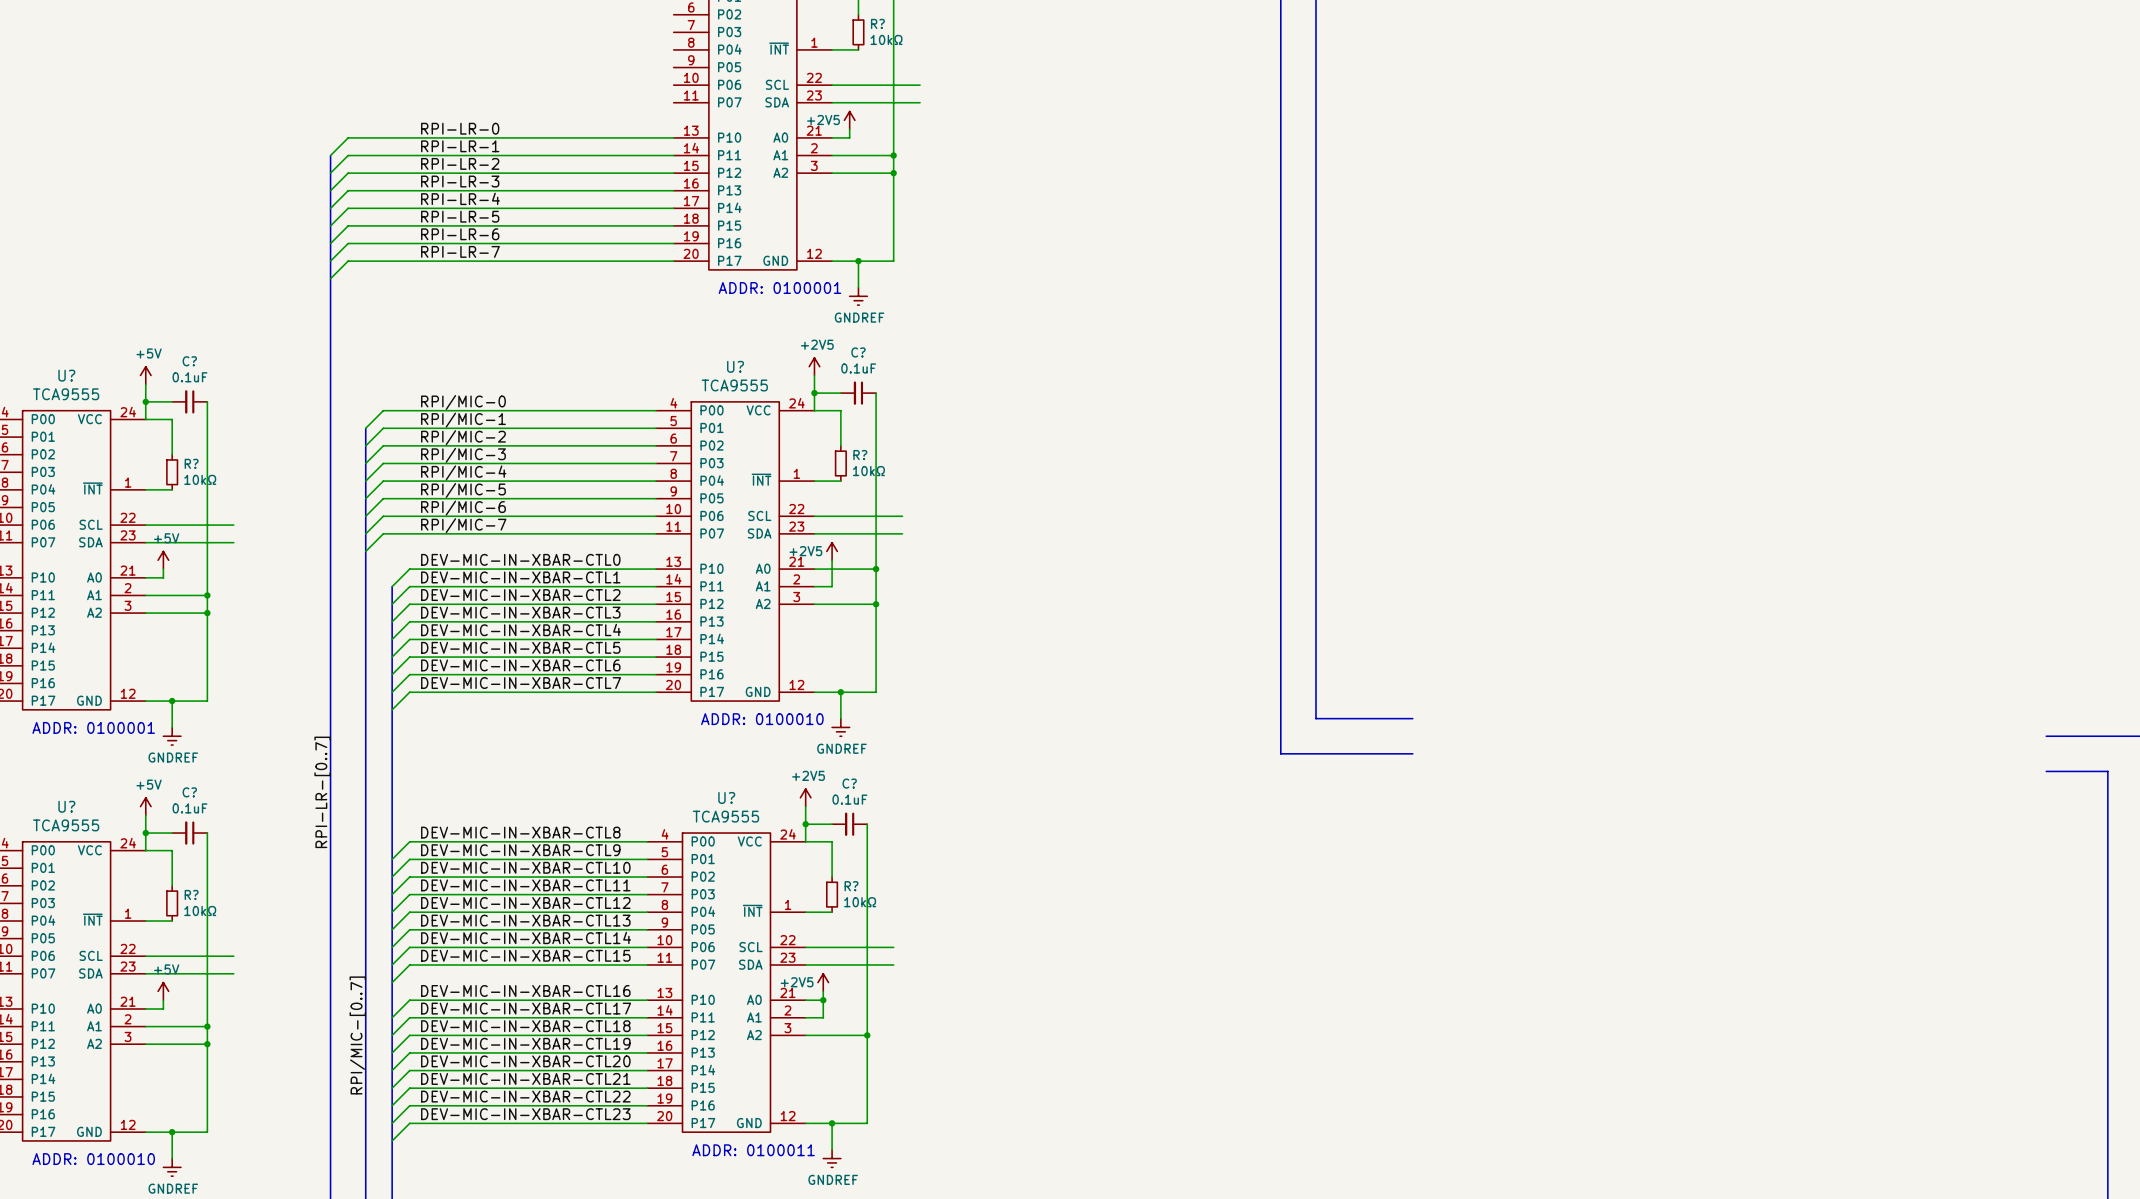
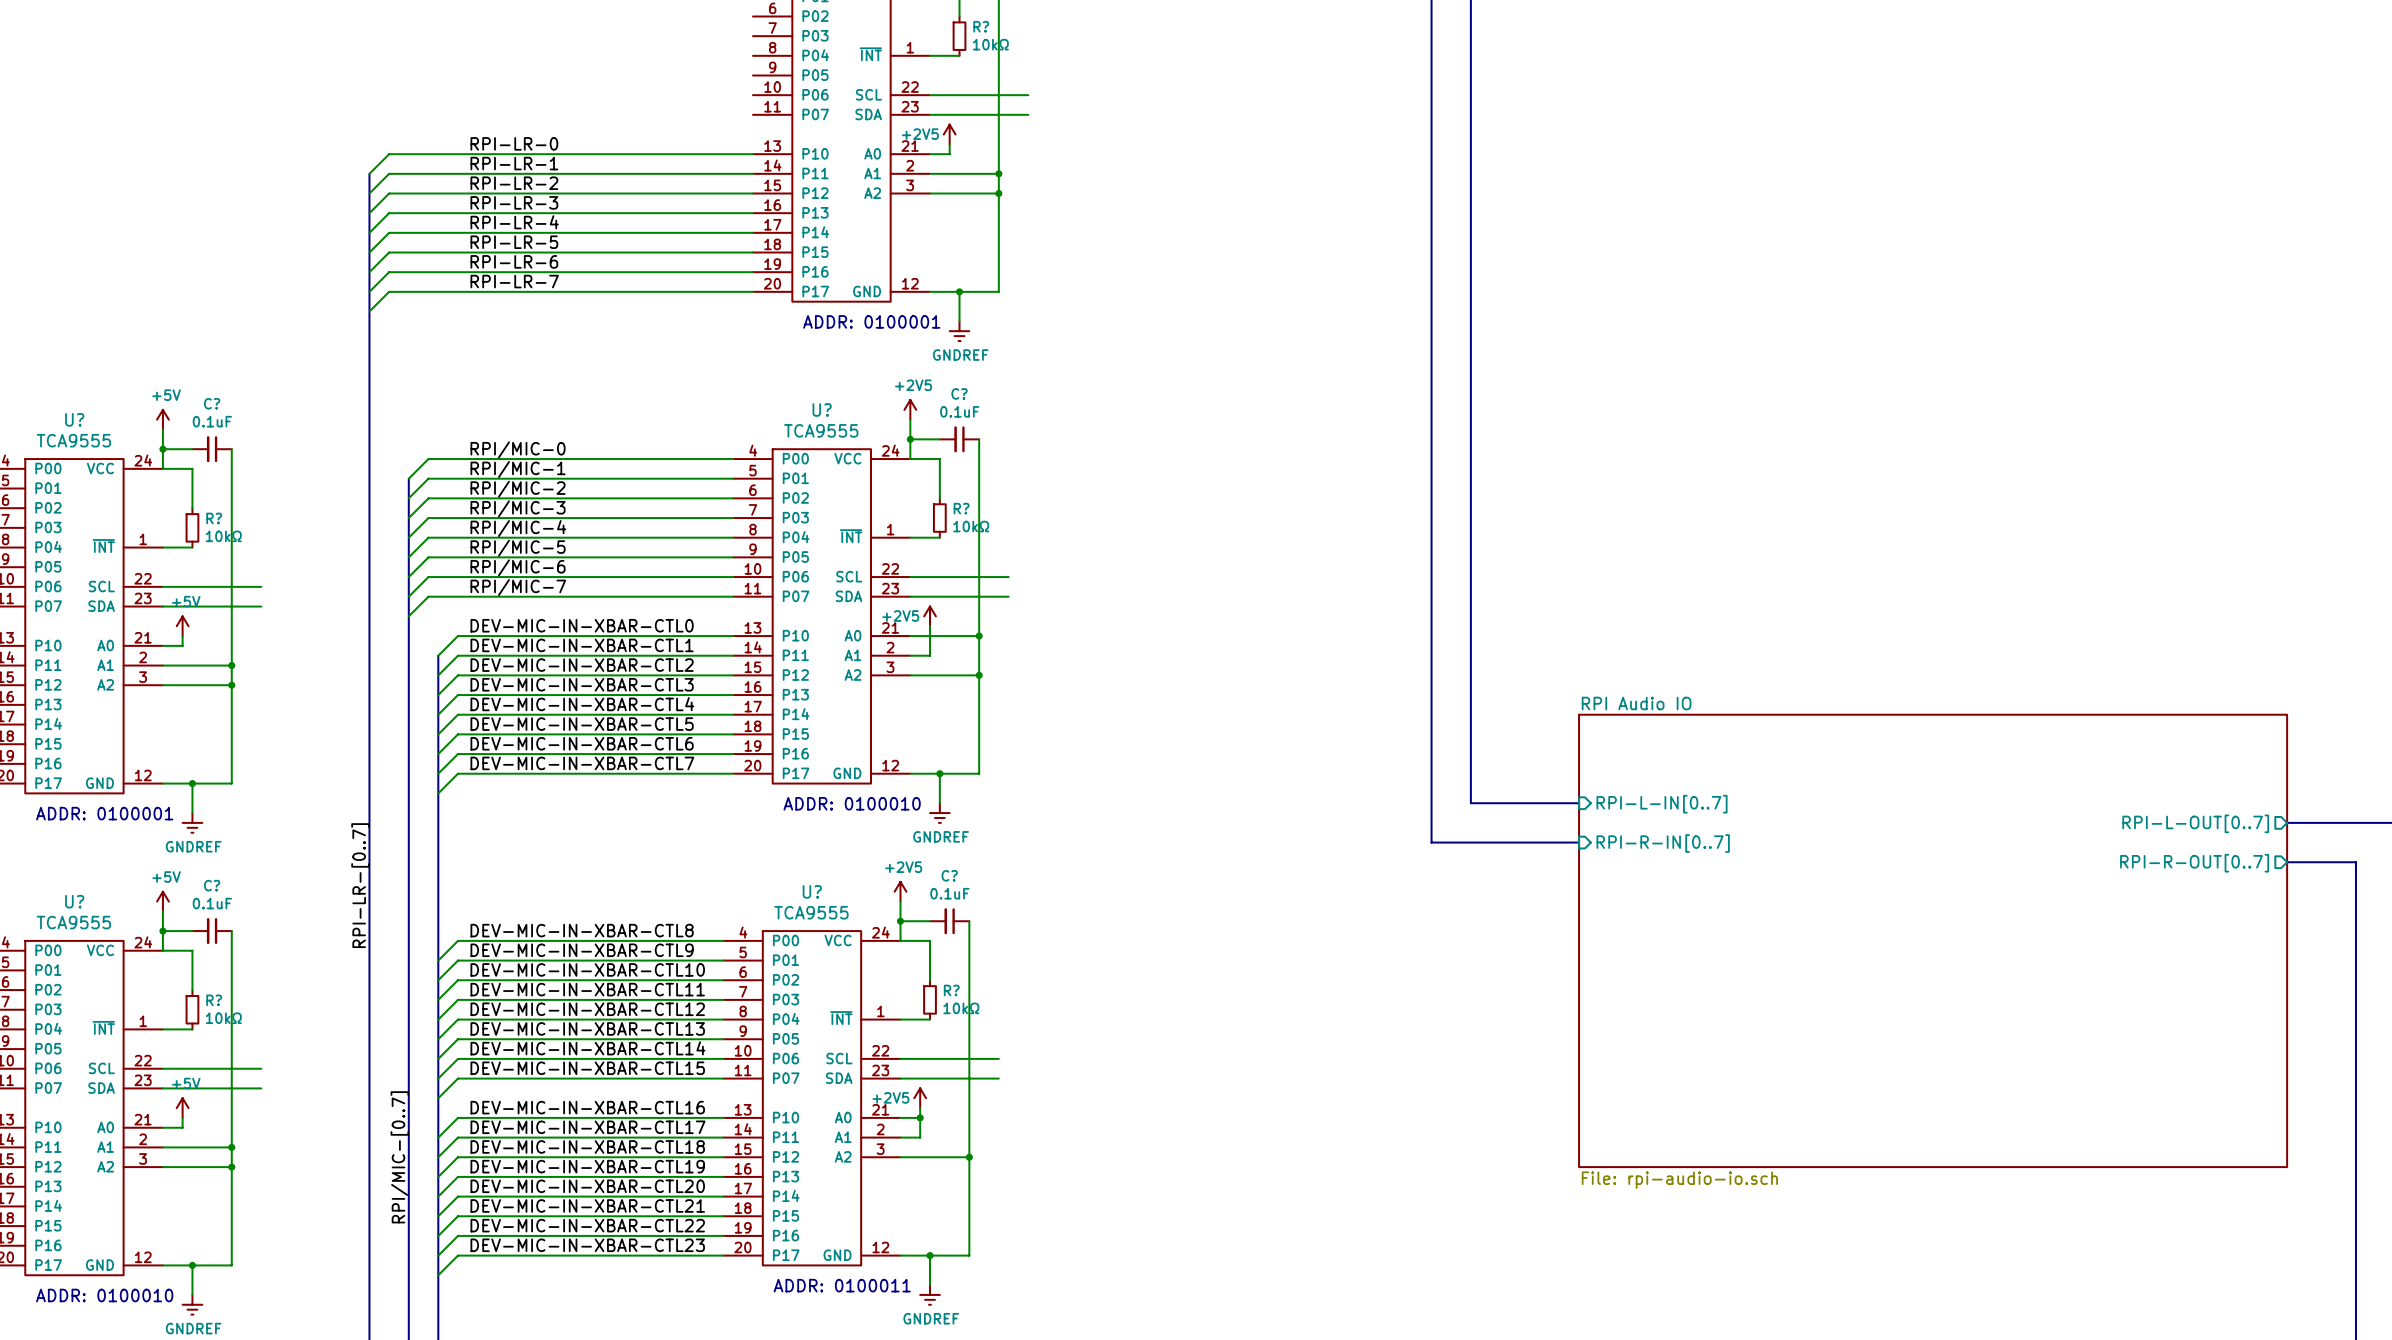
sheet pin: none -> RPI-L-IN[0..7] (1662, 804)
sheet pin: none -> RPI-L-OUT[0..7] (2195, 823)
sheet pin: none -> RPI-R-IN[0..7] (1663, 843)
sheet pin: none -> RPI-R-OUT[0..7] (2194, 863)
sheet RPI Audio IO: none -> File: rpi-audio-io.sch (1933, 940)

